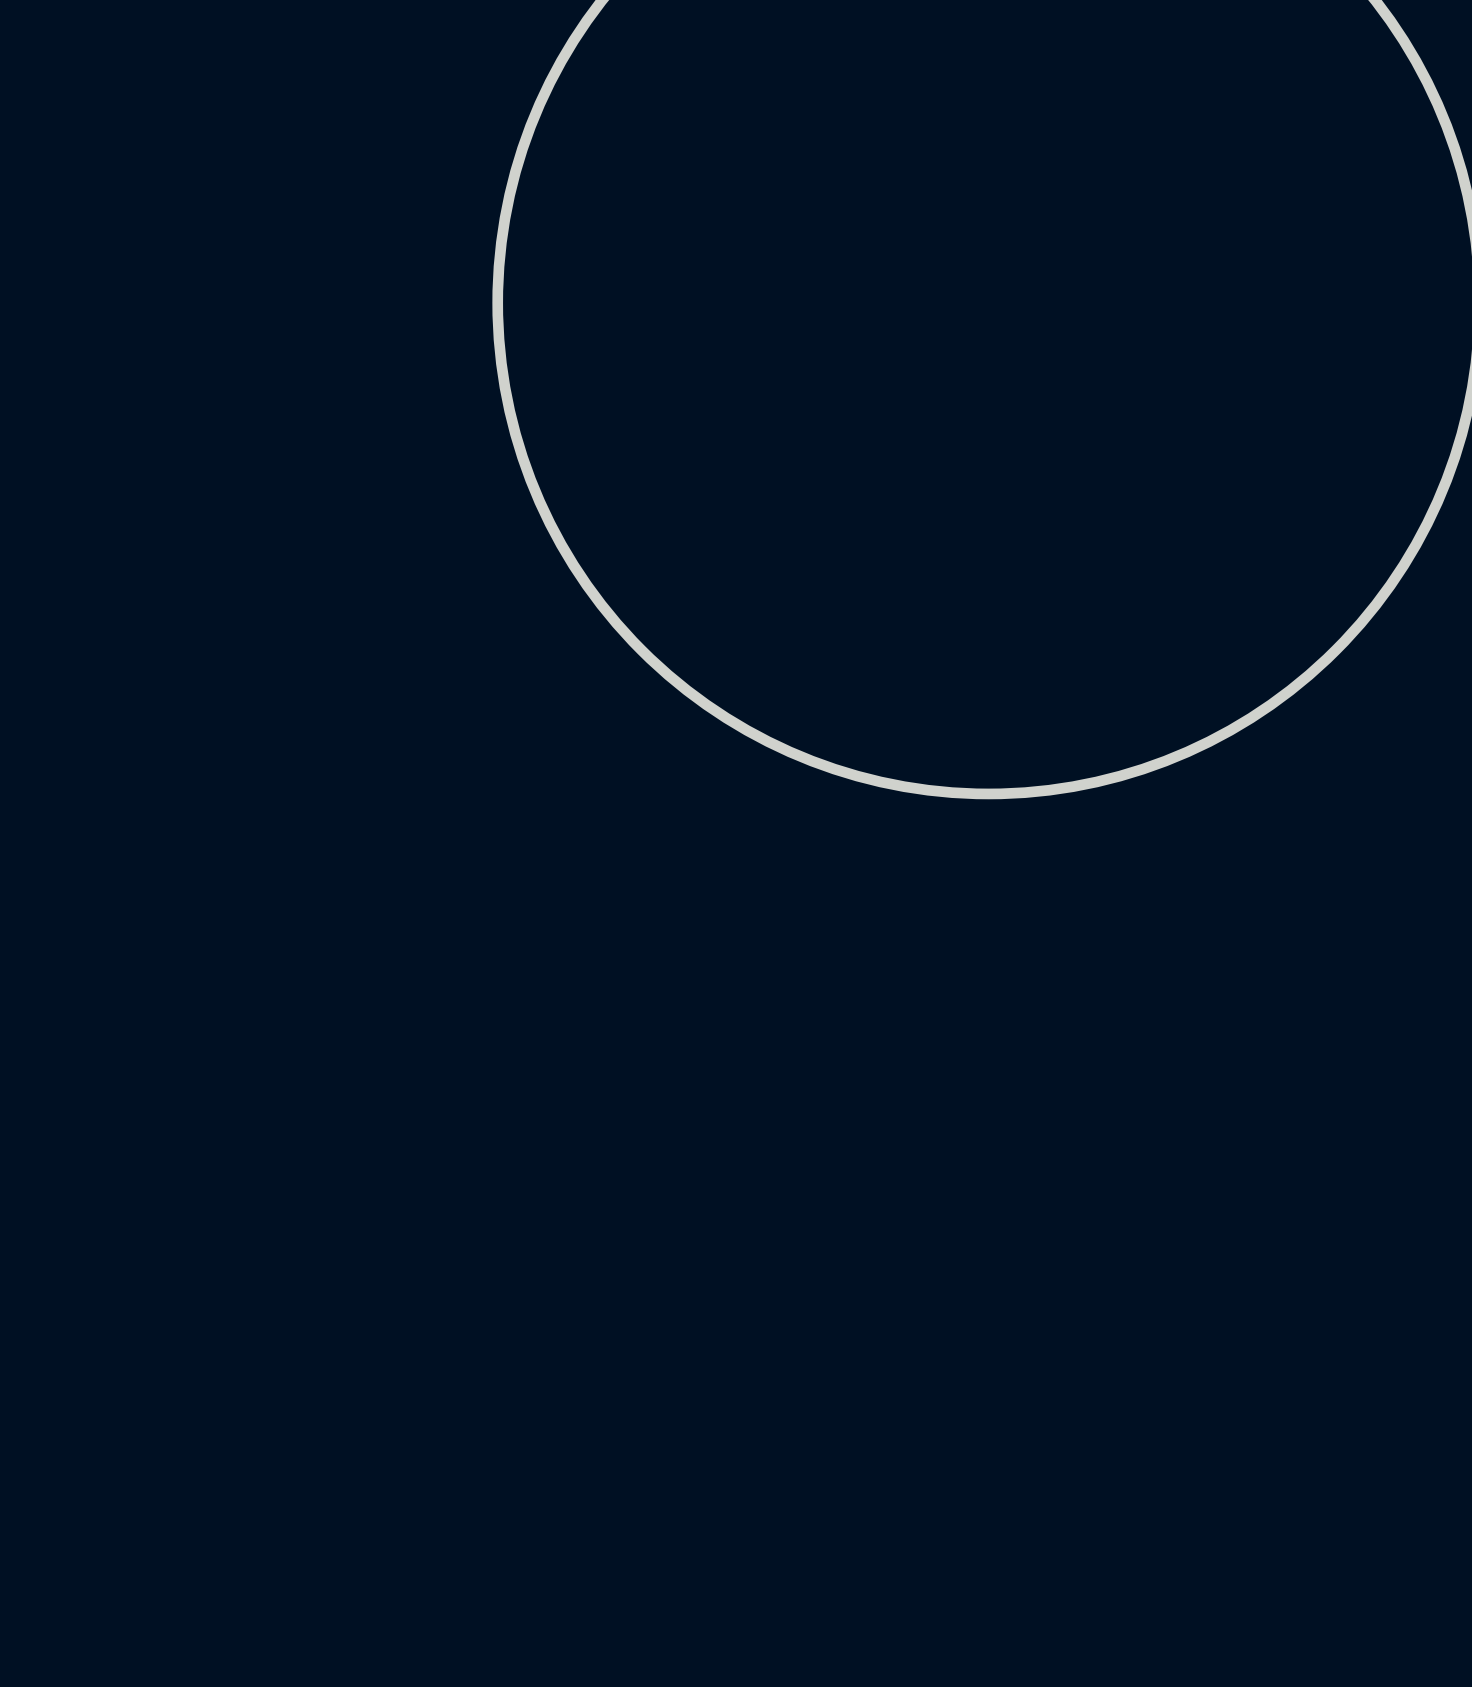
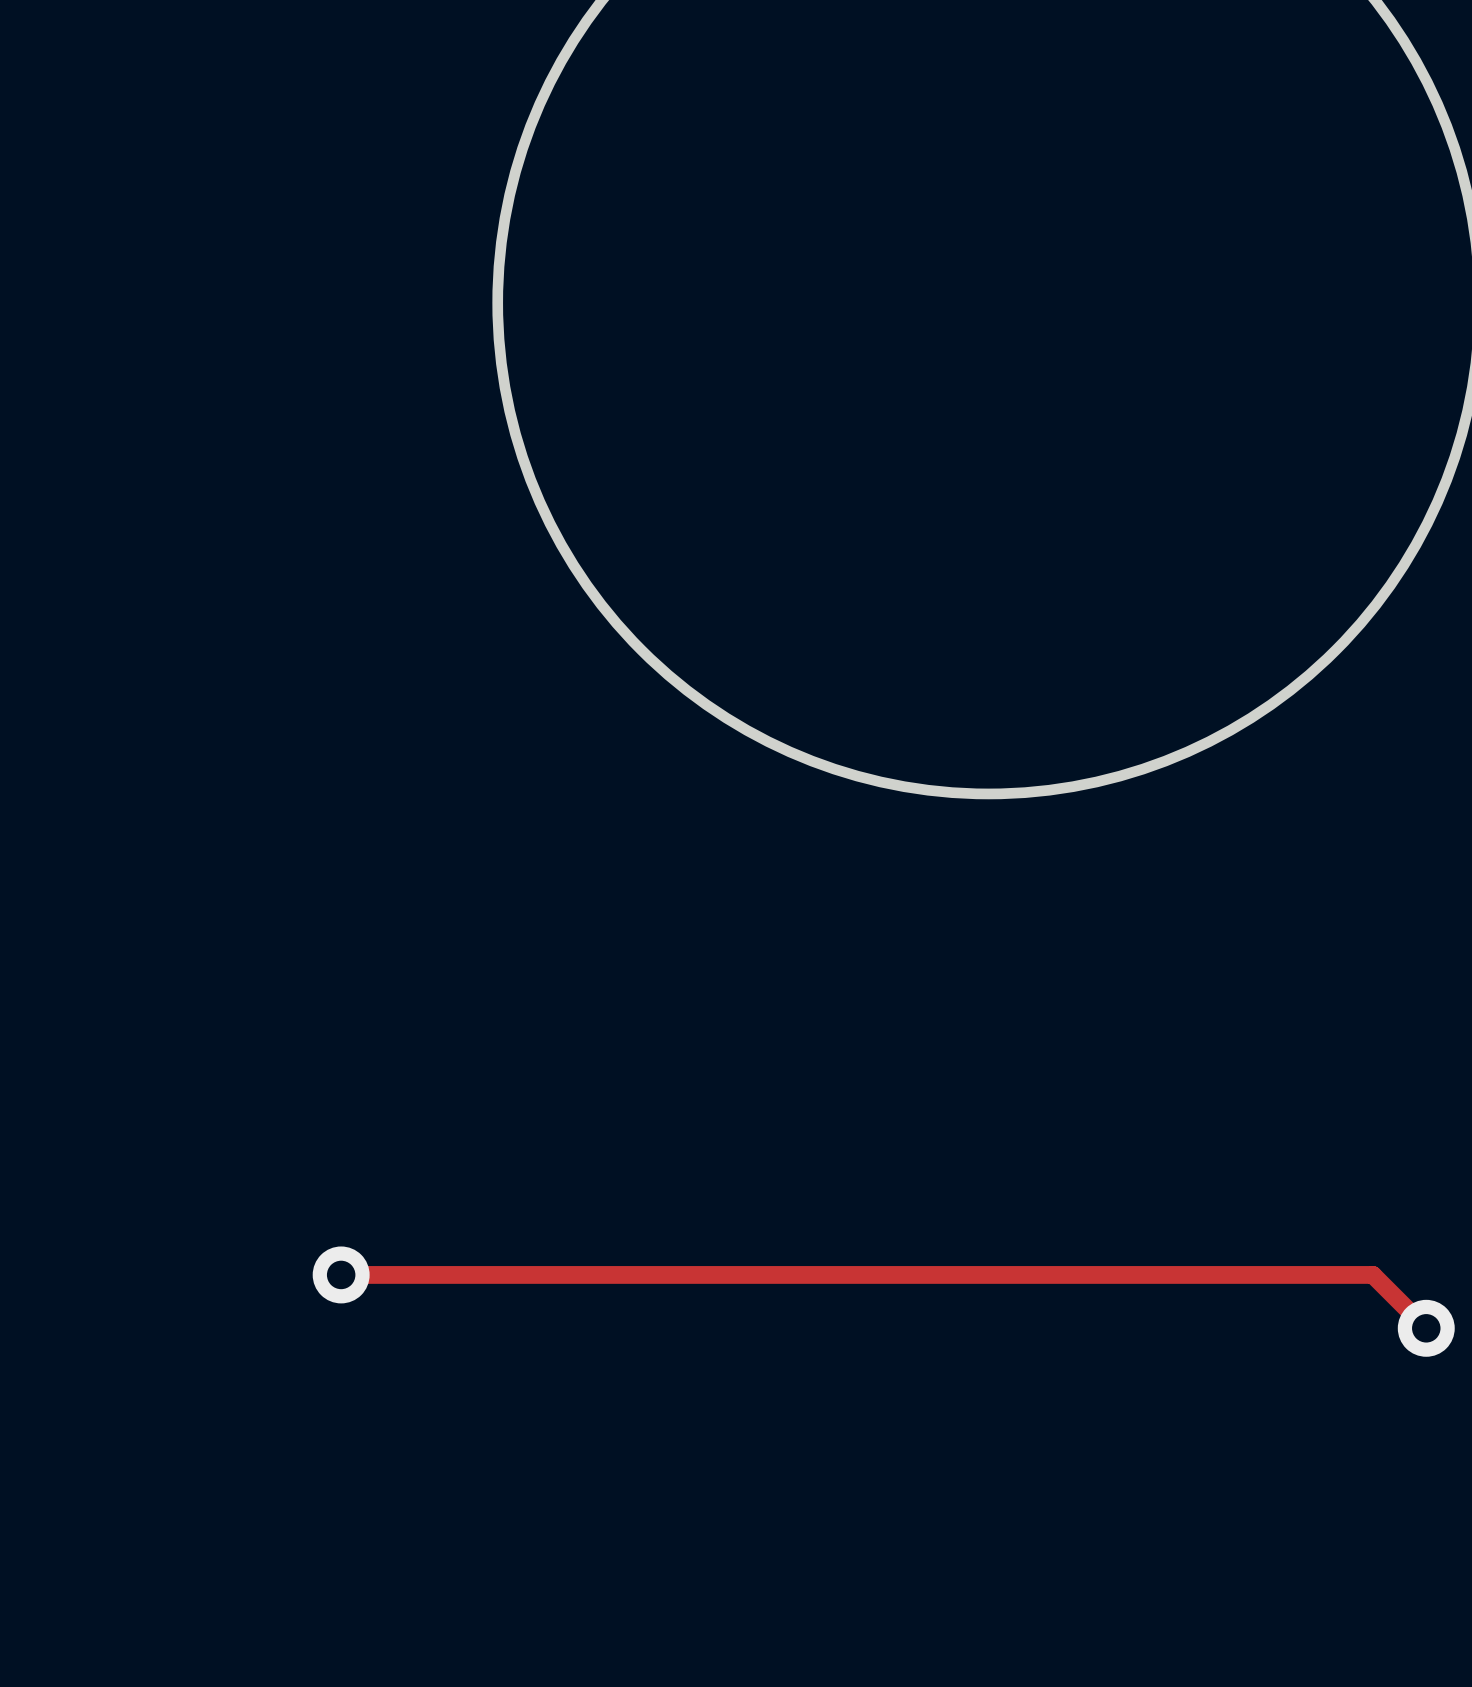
track: none -> (341, 1274) (1372, 1274) (1426, 1328)
via: none -> (341, 1274)
via: none -> (1426, 1328)

